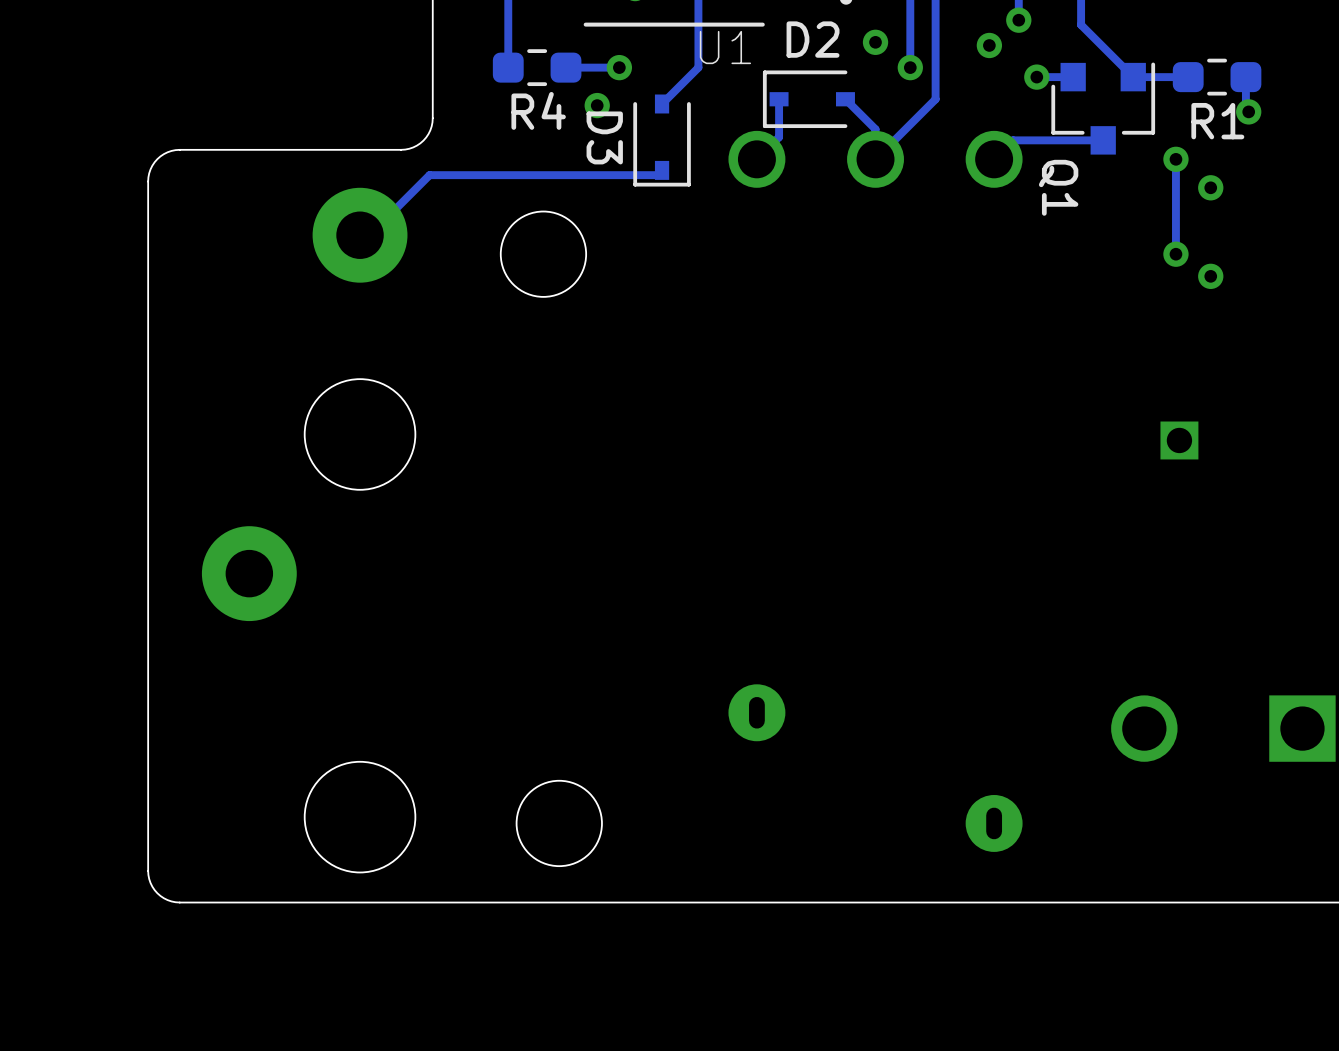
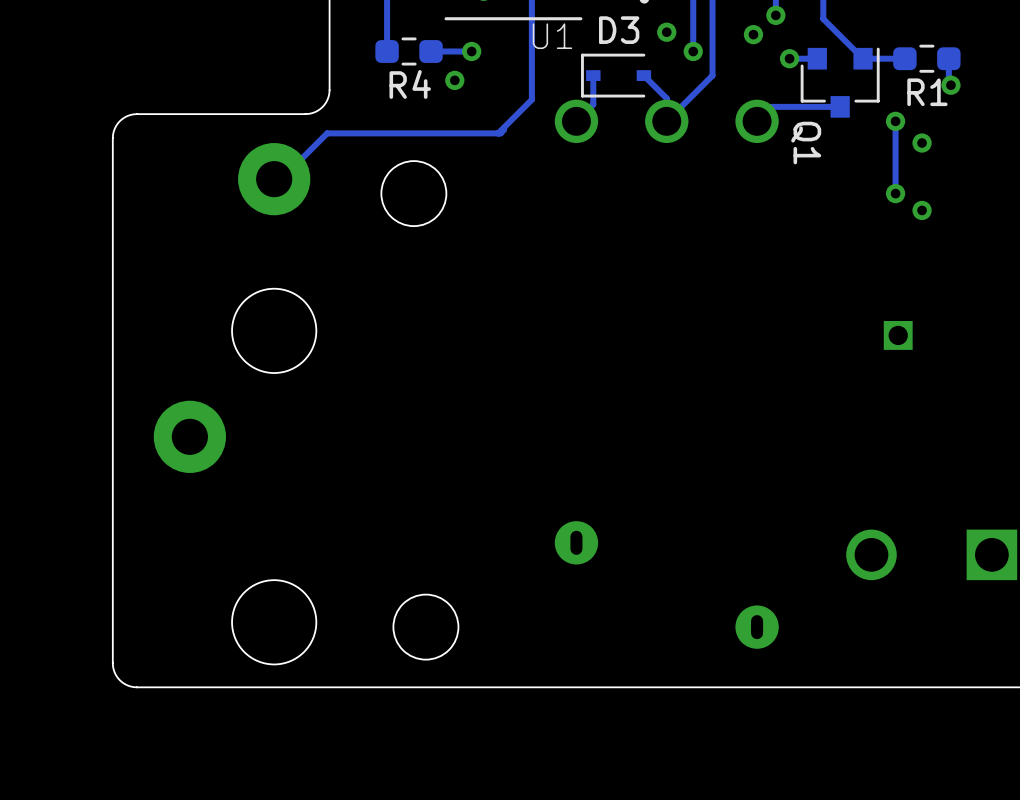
D2 name: D2 (813, 39) -> D3 (619, 30)
track: (698, 67) (662, 103) -> (531, 51) (531, 99) (498, 133)
D3: (662, 140) -> none

